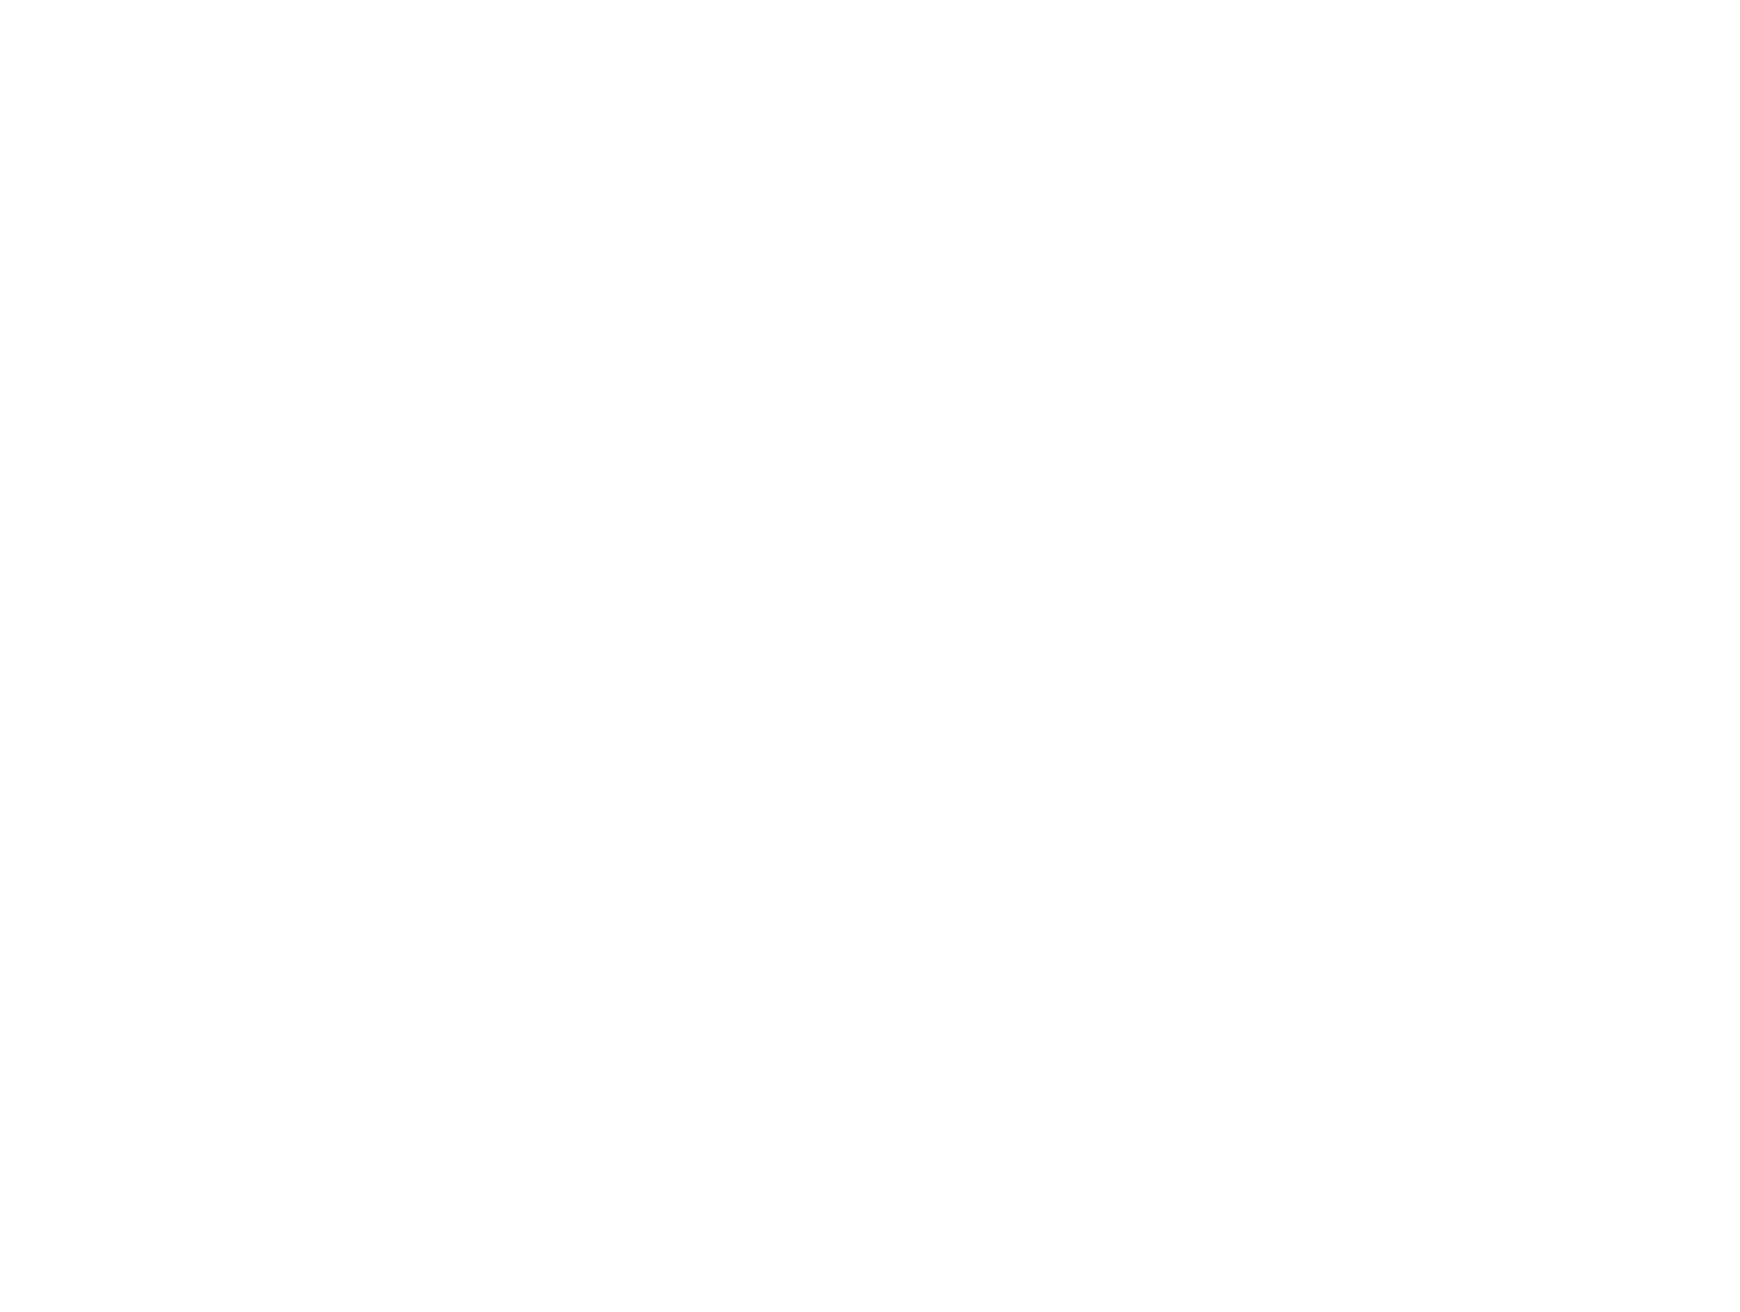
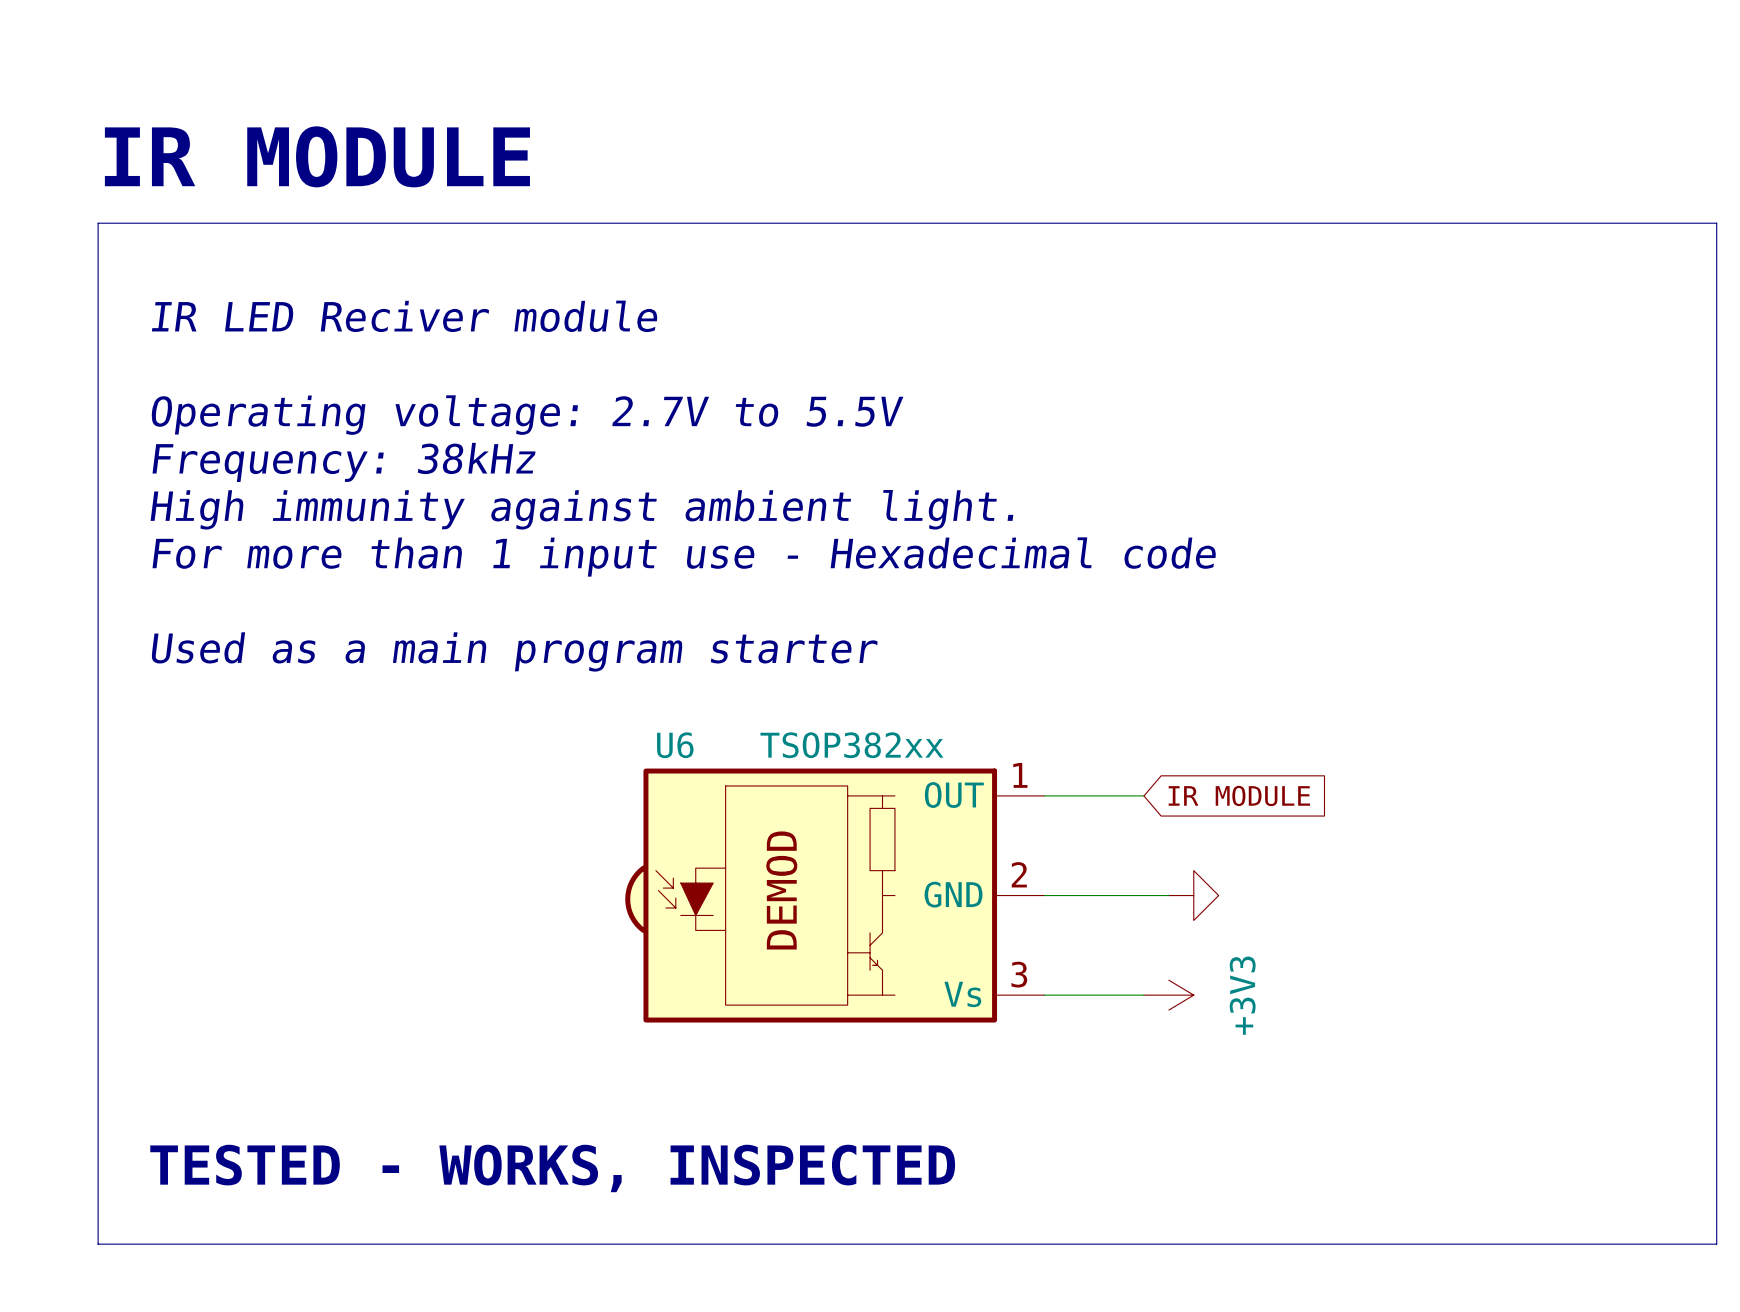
text: none -> IR MODULE (317, 156)
line: none -> (98, 223) (98, 1244) (1716, 1244) (1716, 223) (98, 223)
text: none -> IR LED Reciver module (404, 316)
text: none -> Operating voltage: 2.7V to 5.5V (527, 415)
text: none -> Frequency: 38kHz (343, 462)
text: none -> High immunity against ambient light. (581, 509)
text: none -> For more than 1 input use - Hexadecimal code (684, 556)
text: none -> Used as a main program starter (514, 651)
wire: none -> (1044, 795) (1143, 795)
global label: none -> IR MODULE (1239, 795)
U6: none -> TSOP382xx (834, 895)
wire: none -> (1044, 895) (1168, 895)
power symbol: none -> (1193, 895)
wire: none -> (1044, 995) (1143, 995)
power symbol: none -> +3V3 (1168, 995)
text: none -> TESTED - WORKS, INSPECTED (552, 1168)

